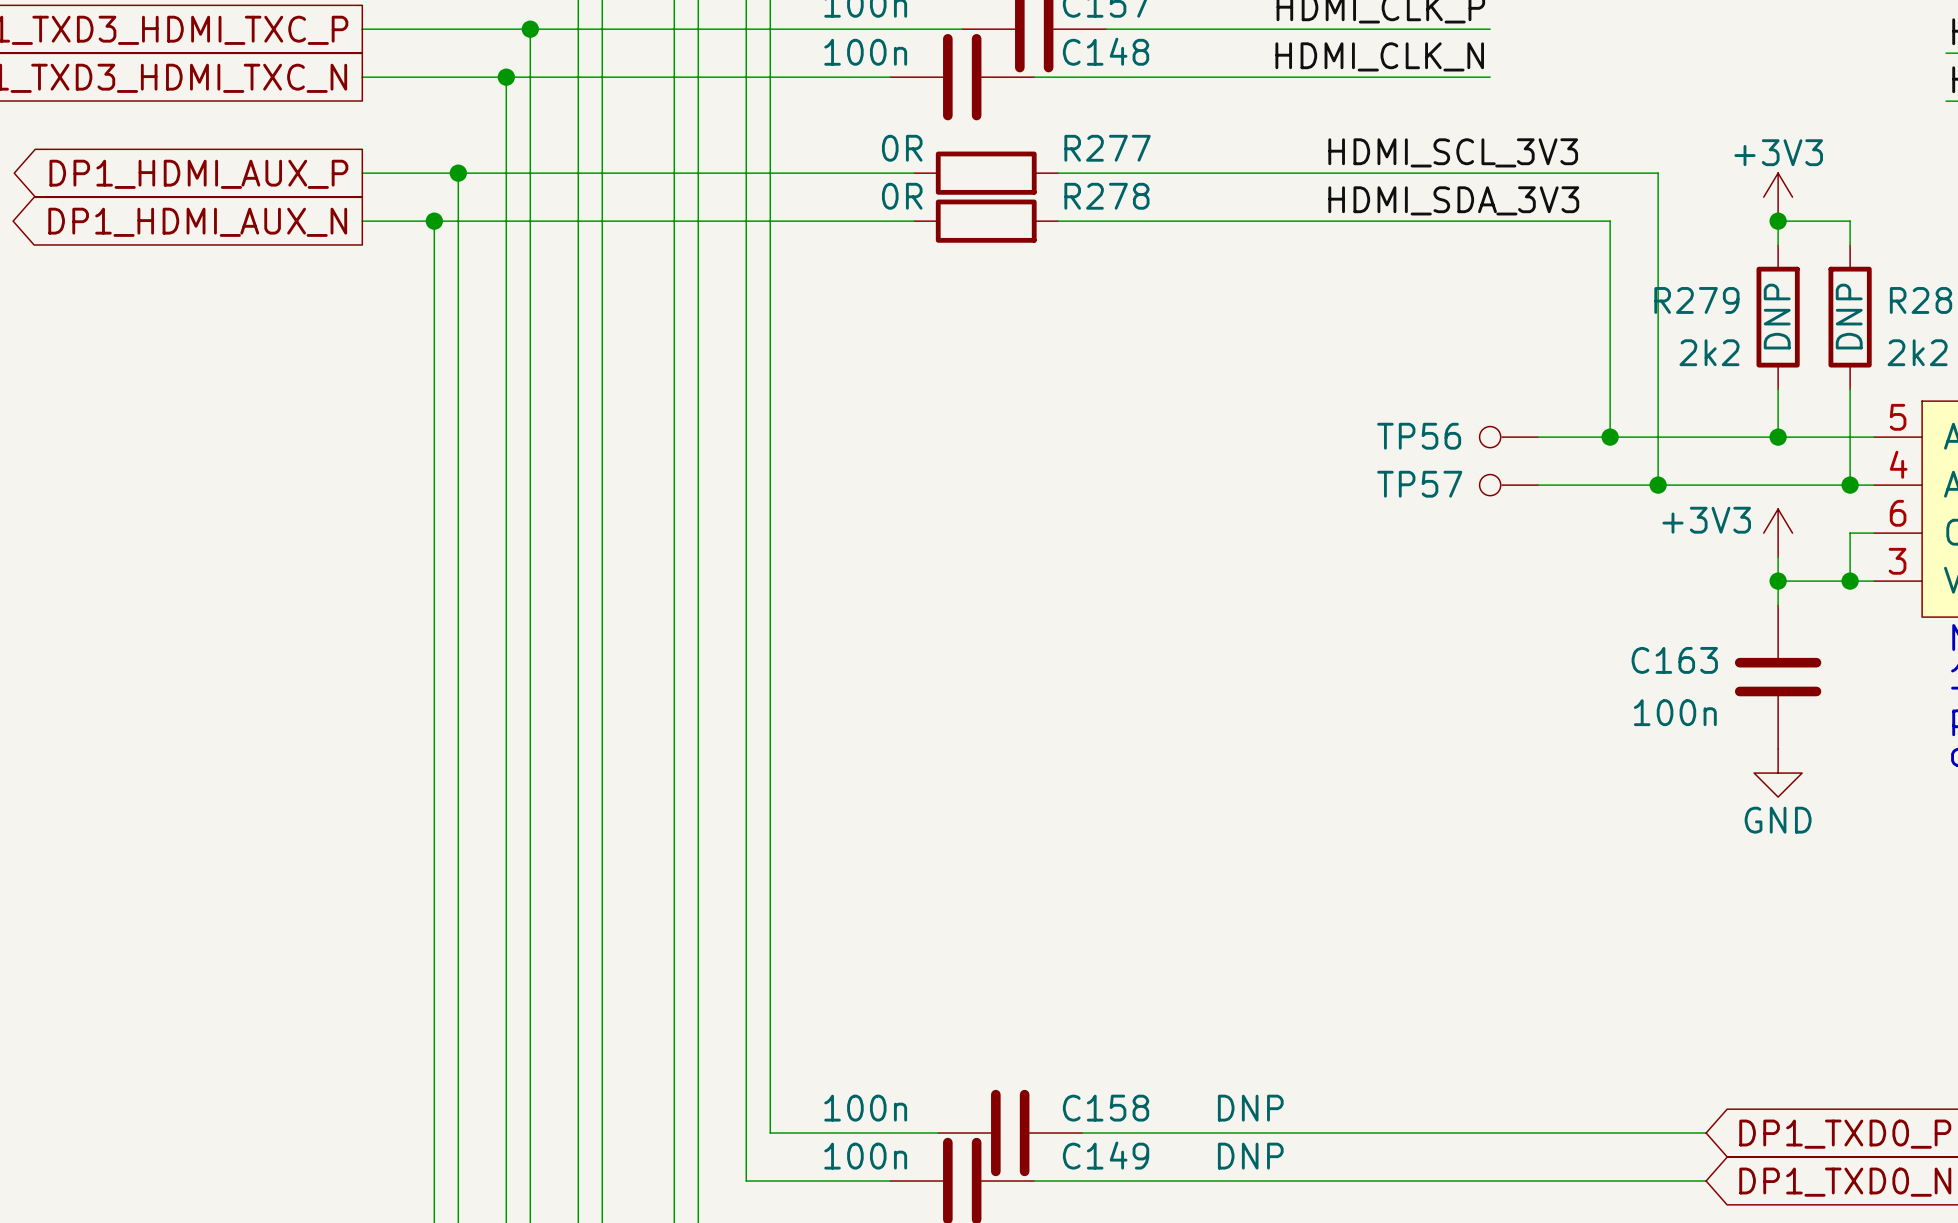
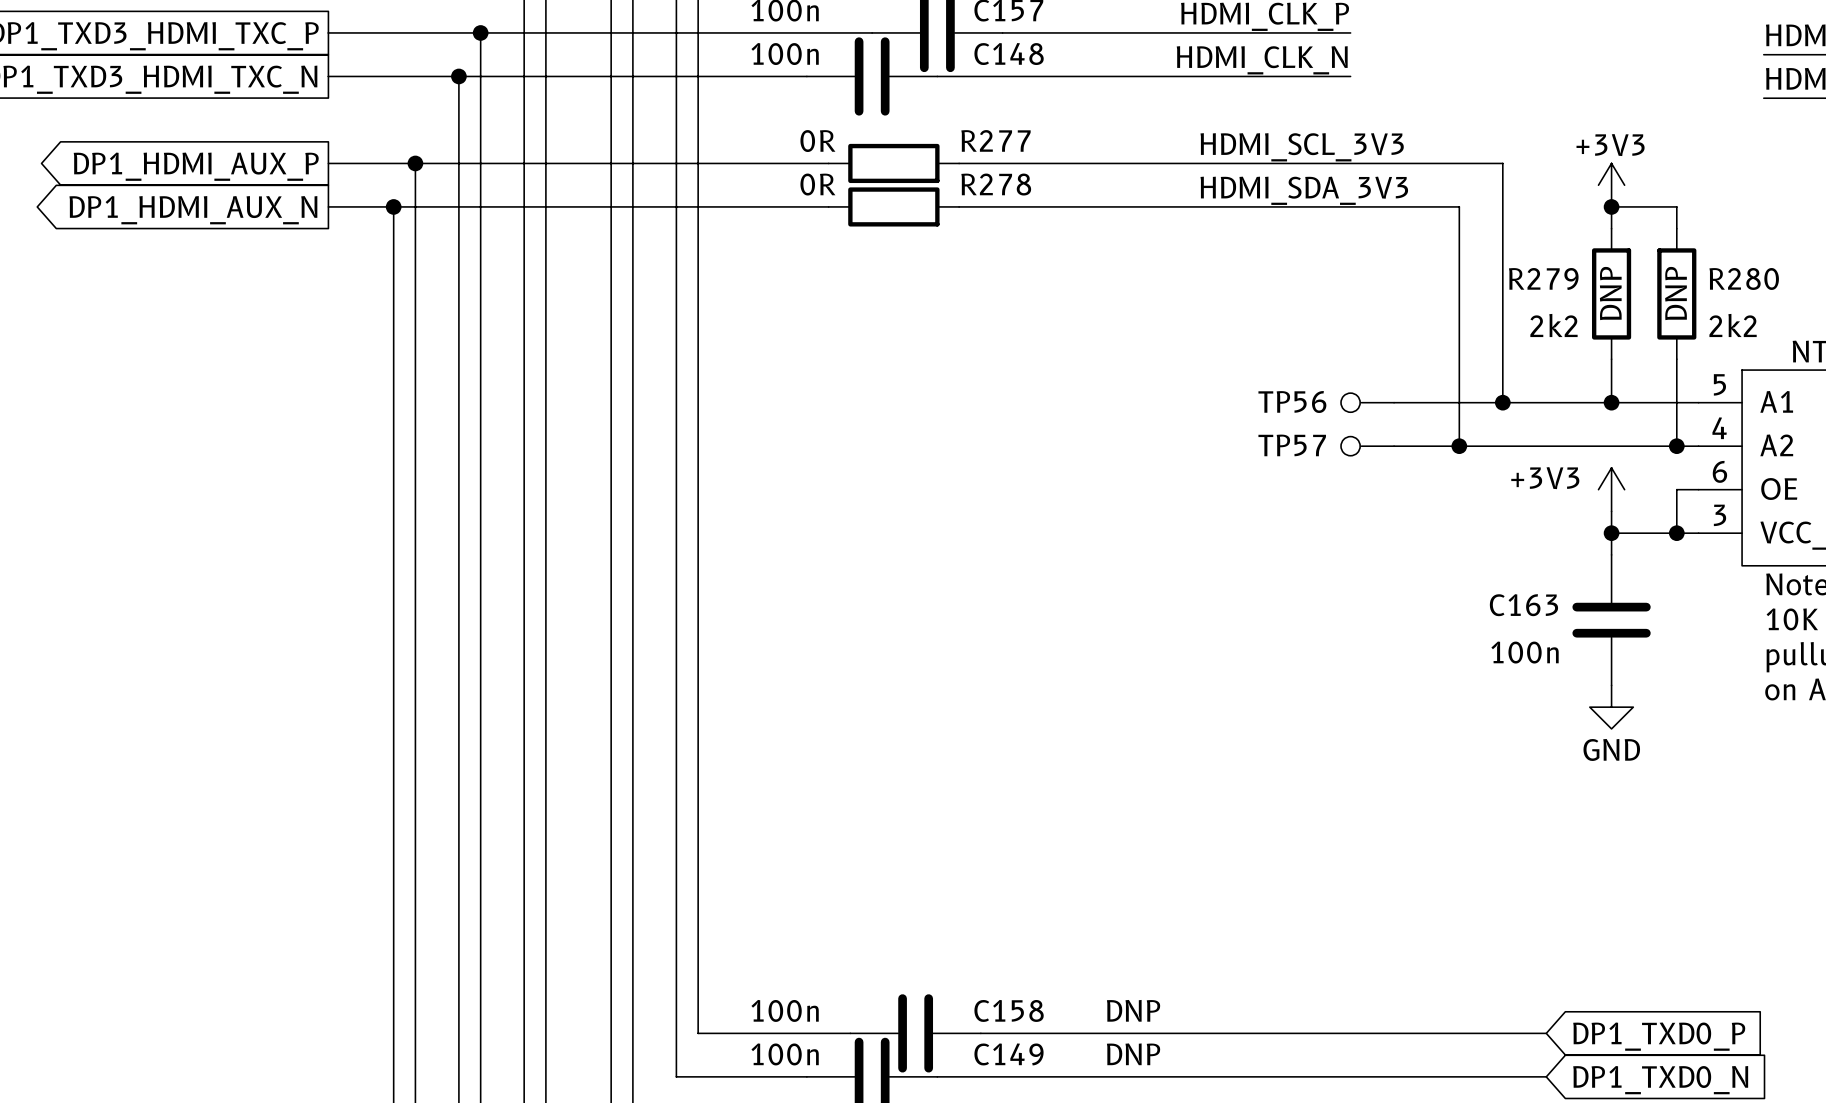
junction: (1610, 437) -> none
wire: (1658, 437) (1658, 485) -> (1459, 402) (1459, 446)
junction: none -> (1502, 402)
junction: none -> (1459, 446)
junction: (1658, 485) -> none

